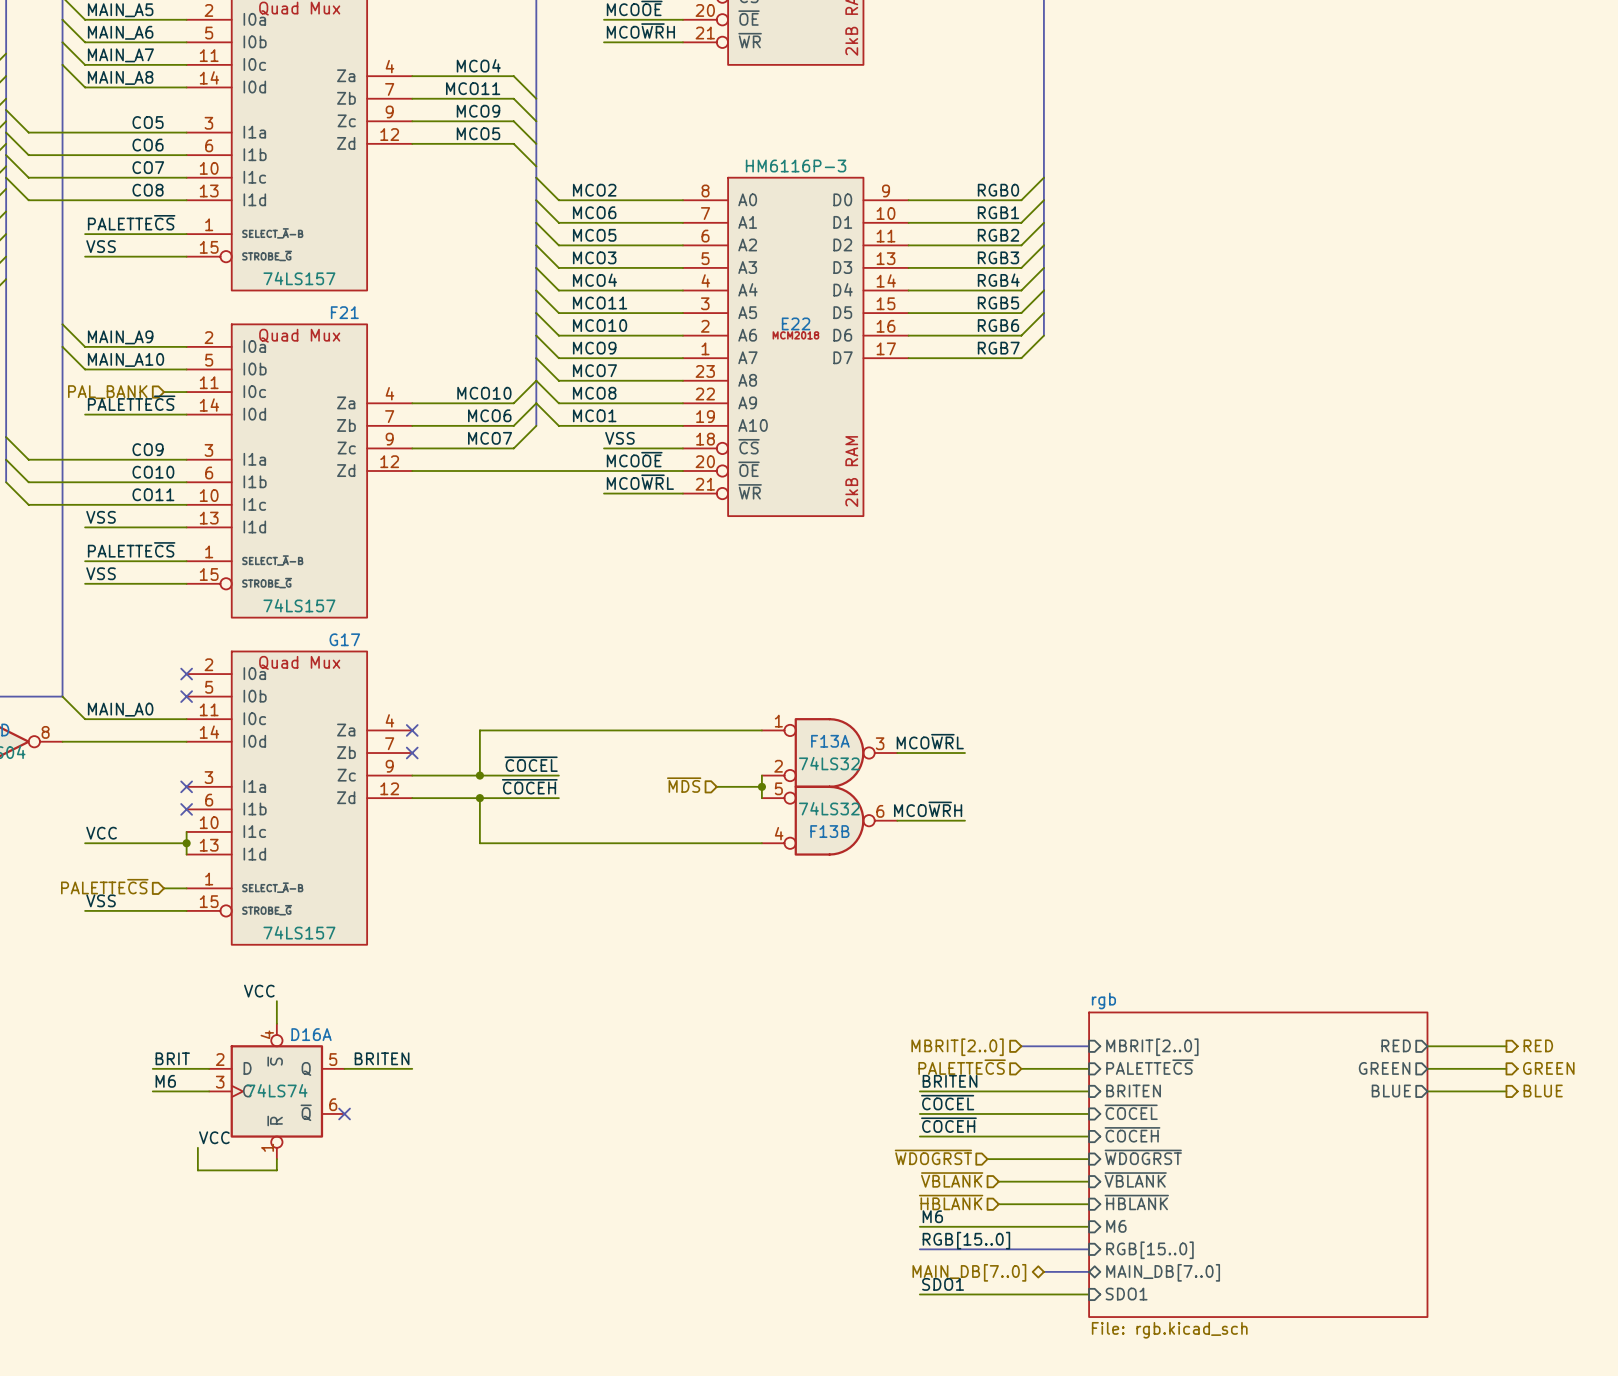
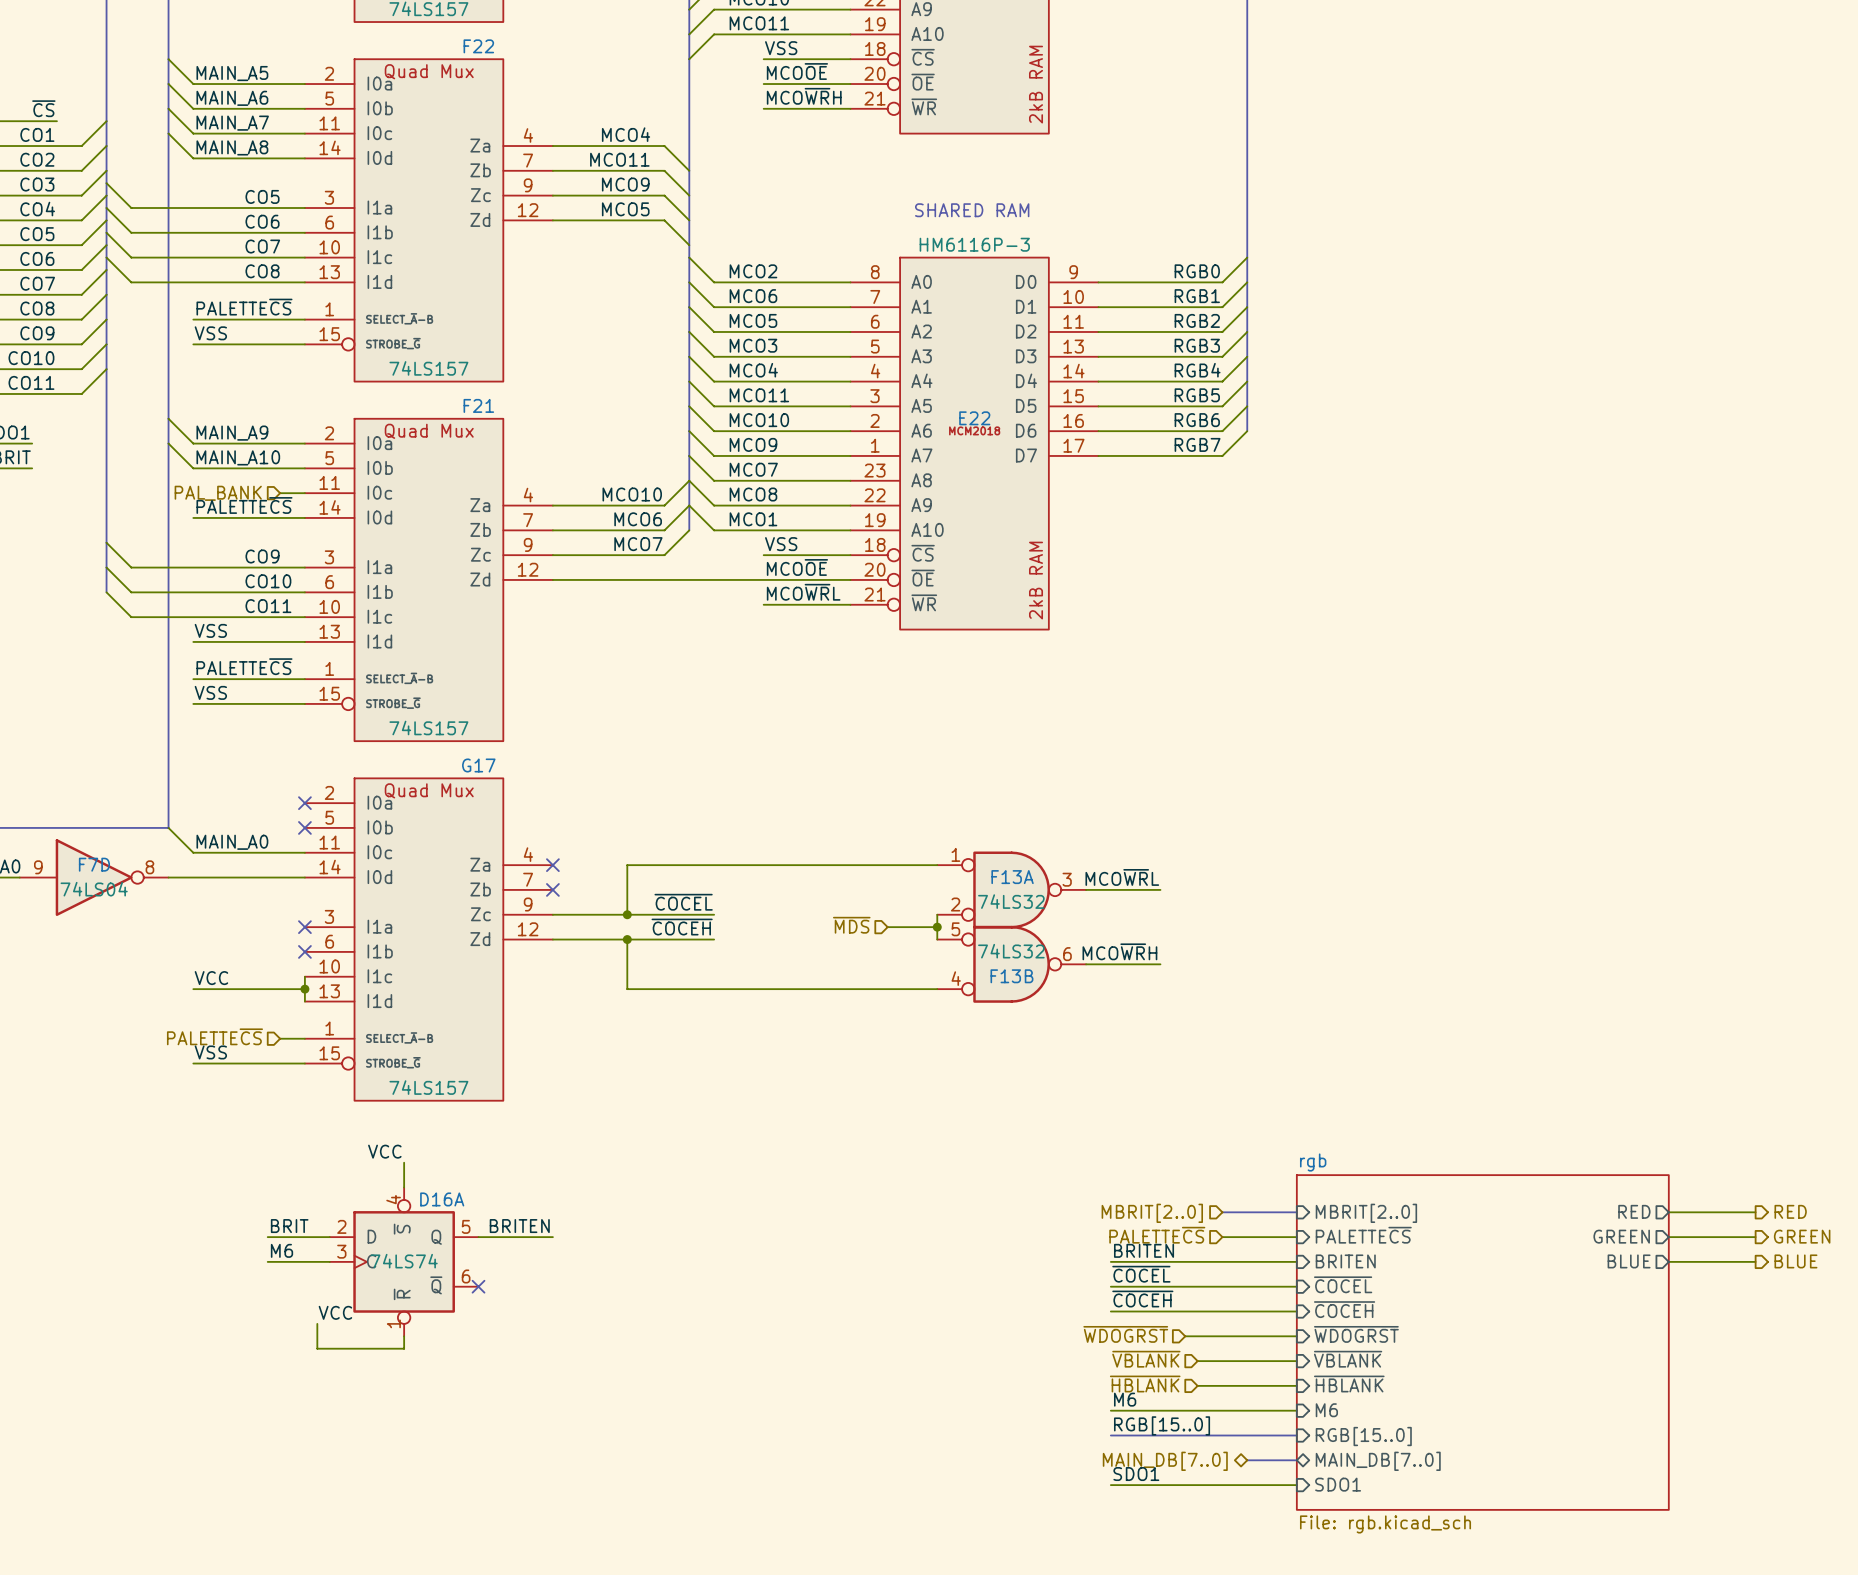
text: none -> SHARED RAM (972, 210)

